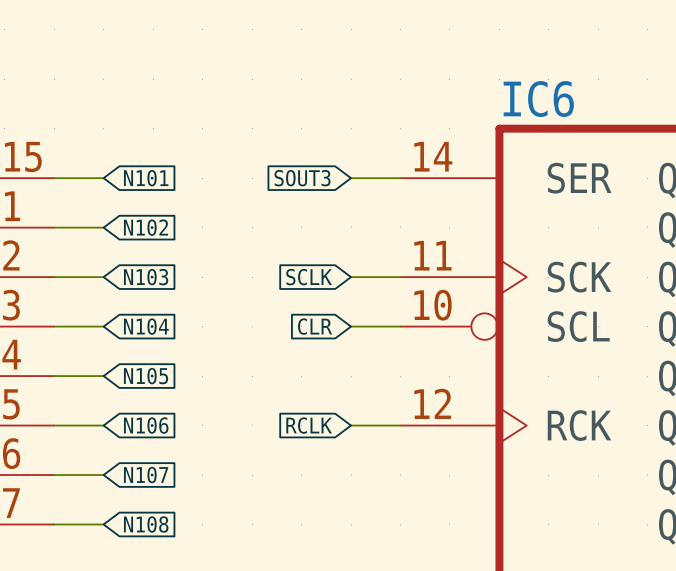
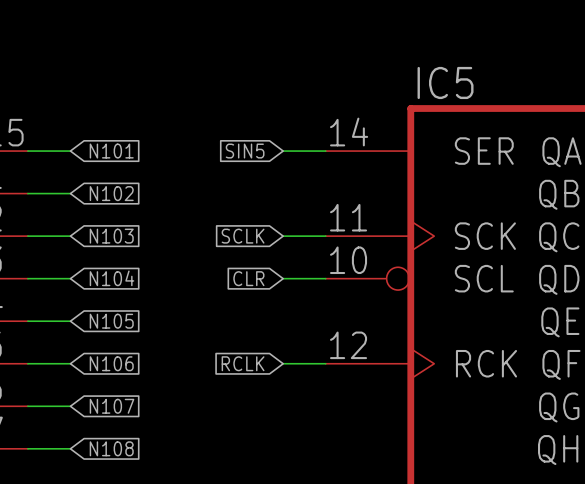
IC6 name: IC6 (538, 99) -> IC5 (445, 82)
global label: SOUT3 (302, 178) -> SIN5 (245, 151)

